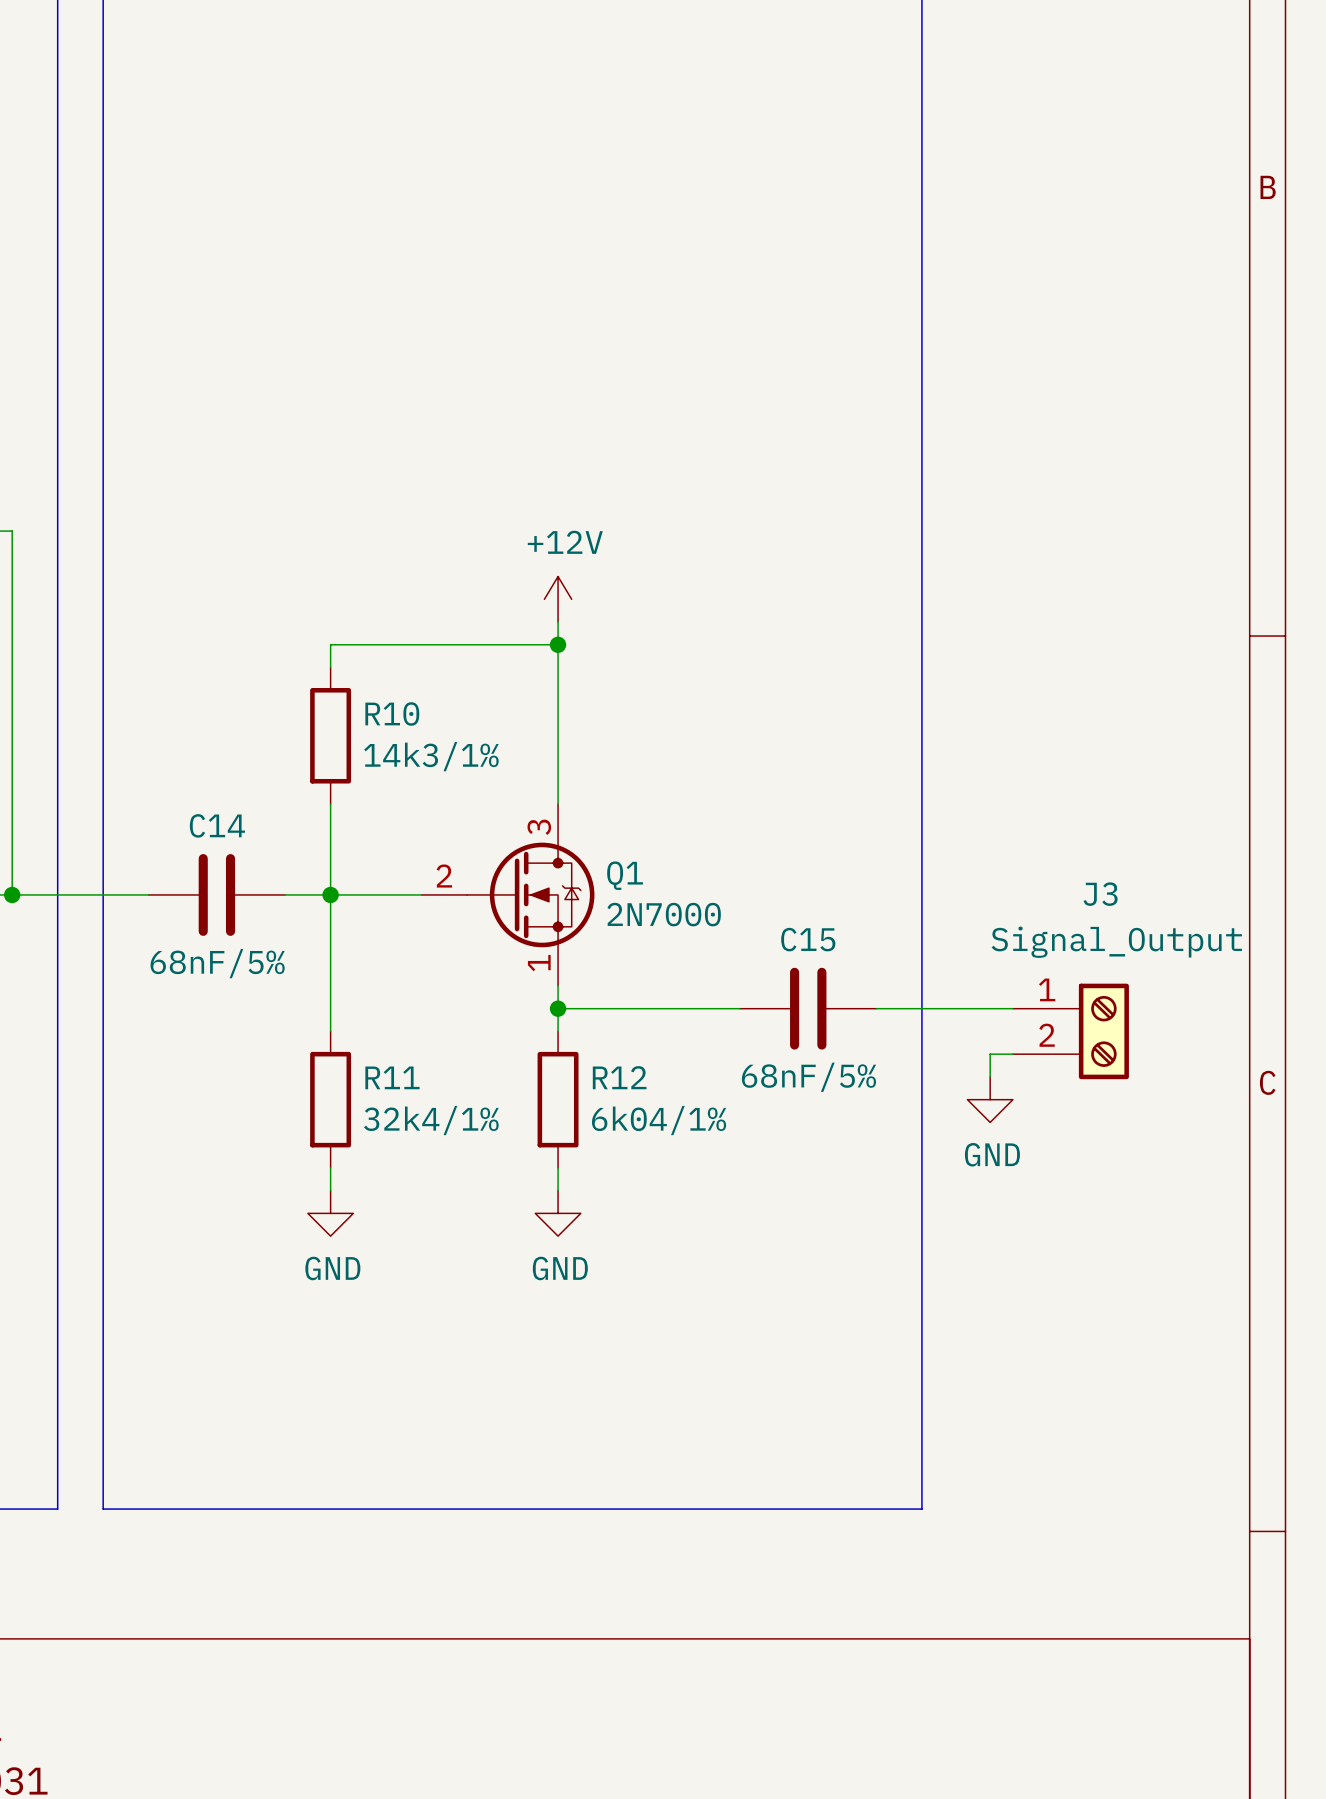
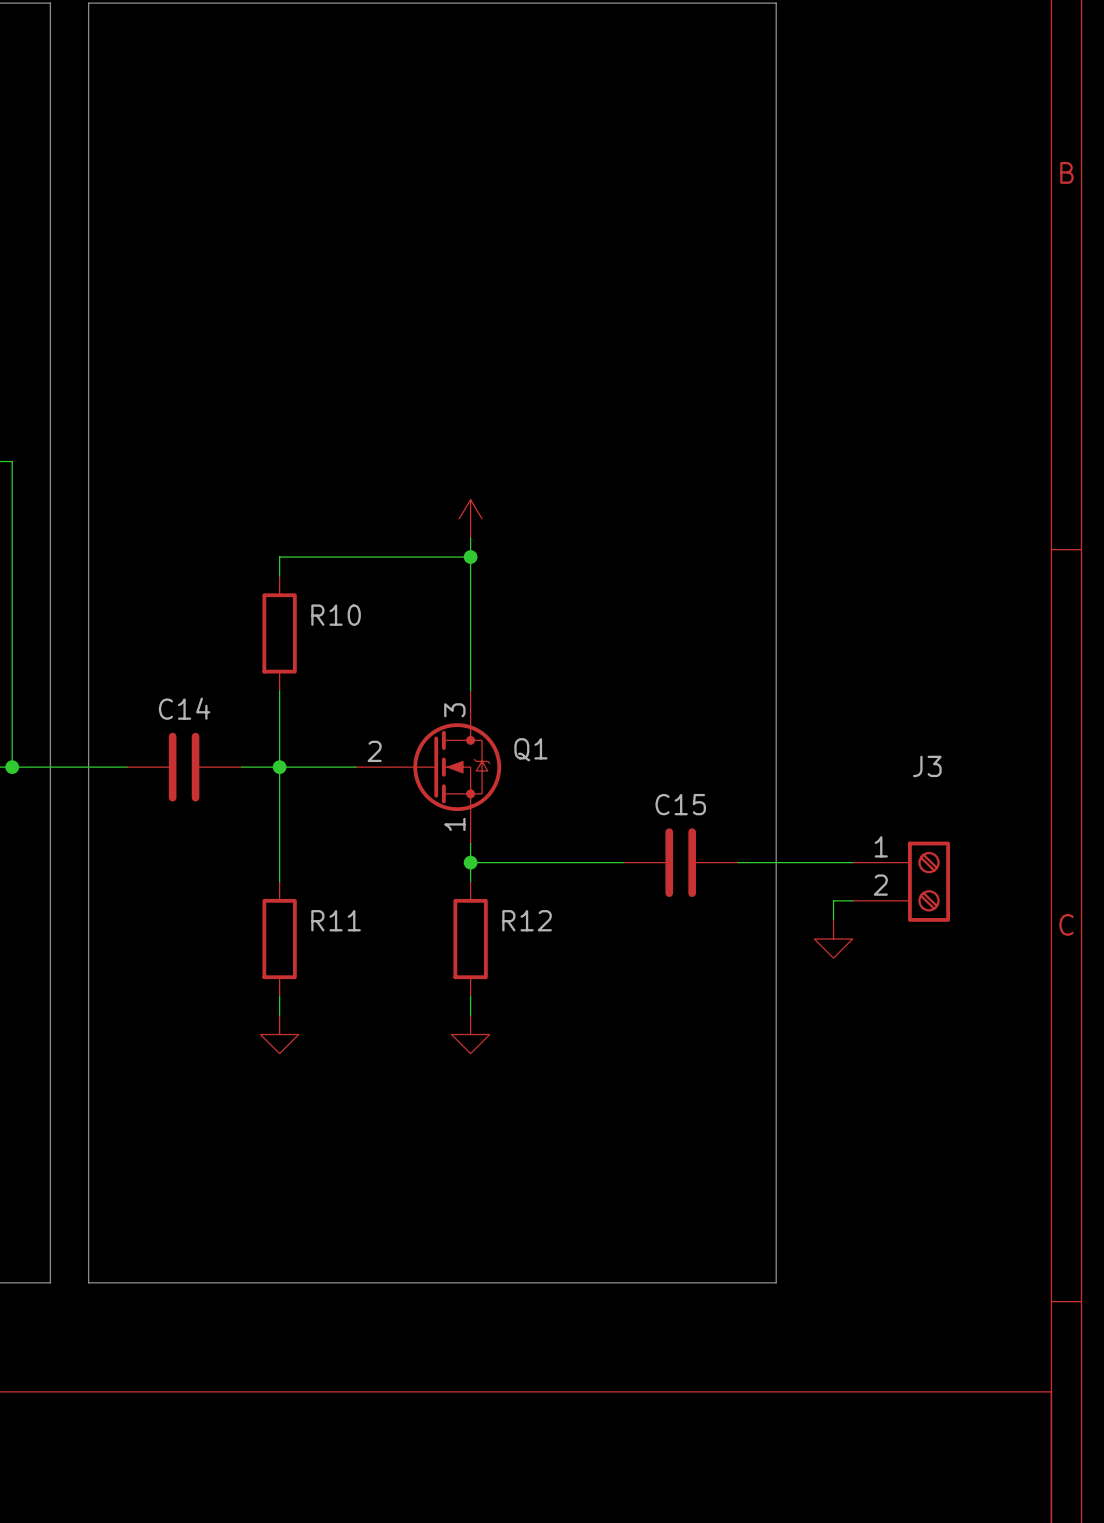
power symbol text: +12V (565, 542) -> none
R10 value: 14k3/1% (431, 756) -> none
Q1 value: 2N7000 (664, 914) -> none
J3 value: Signal_Output (1116, 942) -> none
C14 value: 68nF/5% (217, 963) -> none
C15 value: 68nF/5% (808, 1077) -> none
R11 value: 32k4/1% (431, 1120) -> none
R12 value: 6k04/1% (659, 1120) -> none
power symbol text: GND (992, 1154) -> none
power symbol text: GND (332, 1268) -> none
power symbol text: GND (560, 1268) -> none

